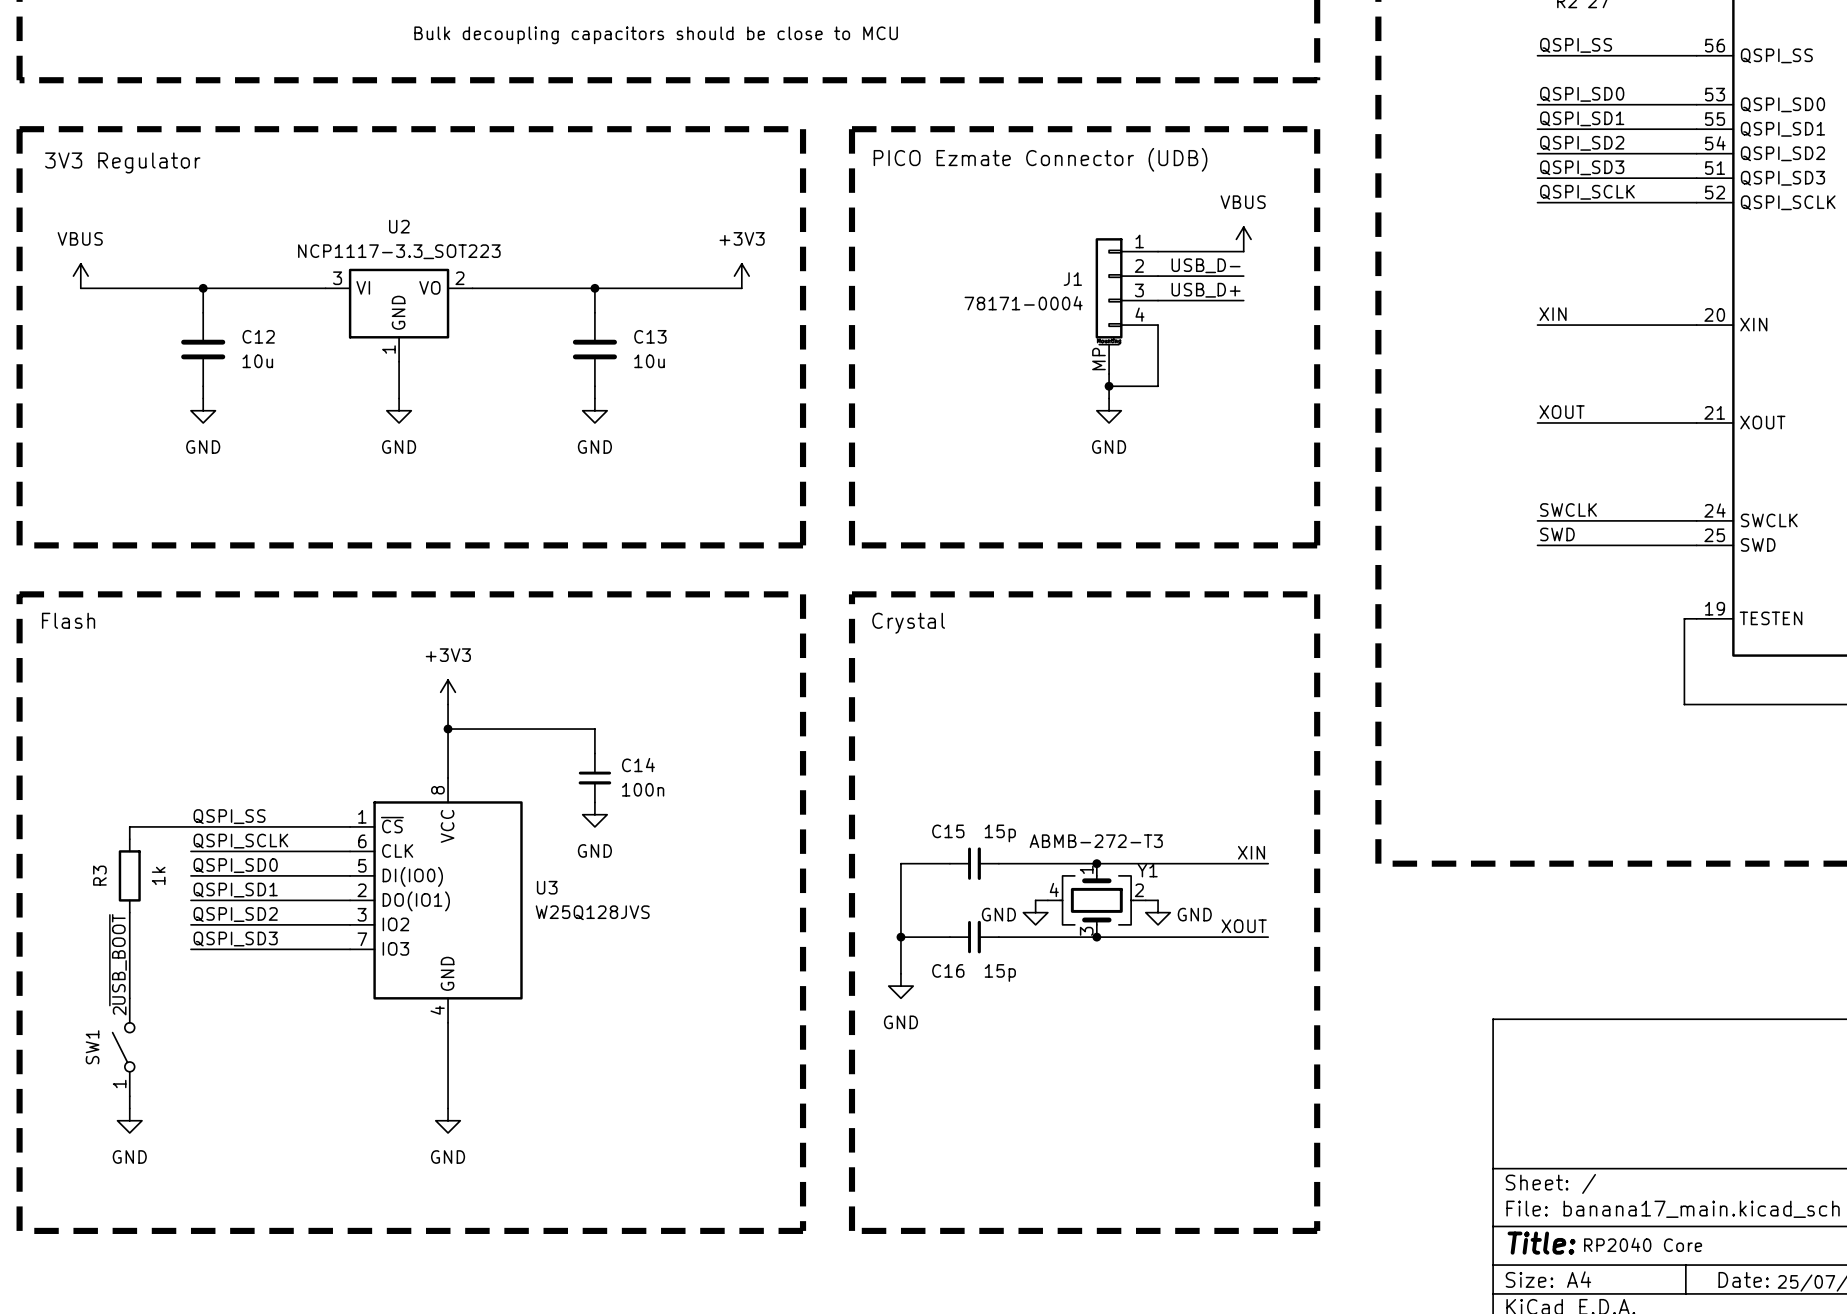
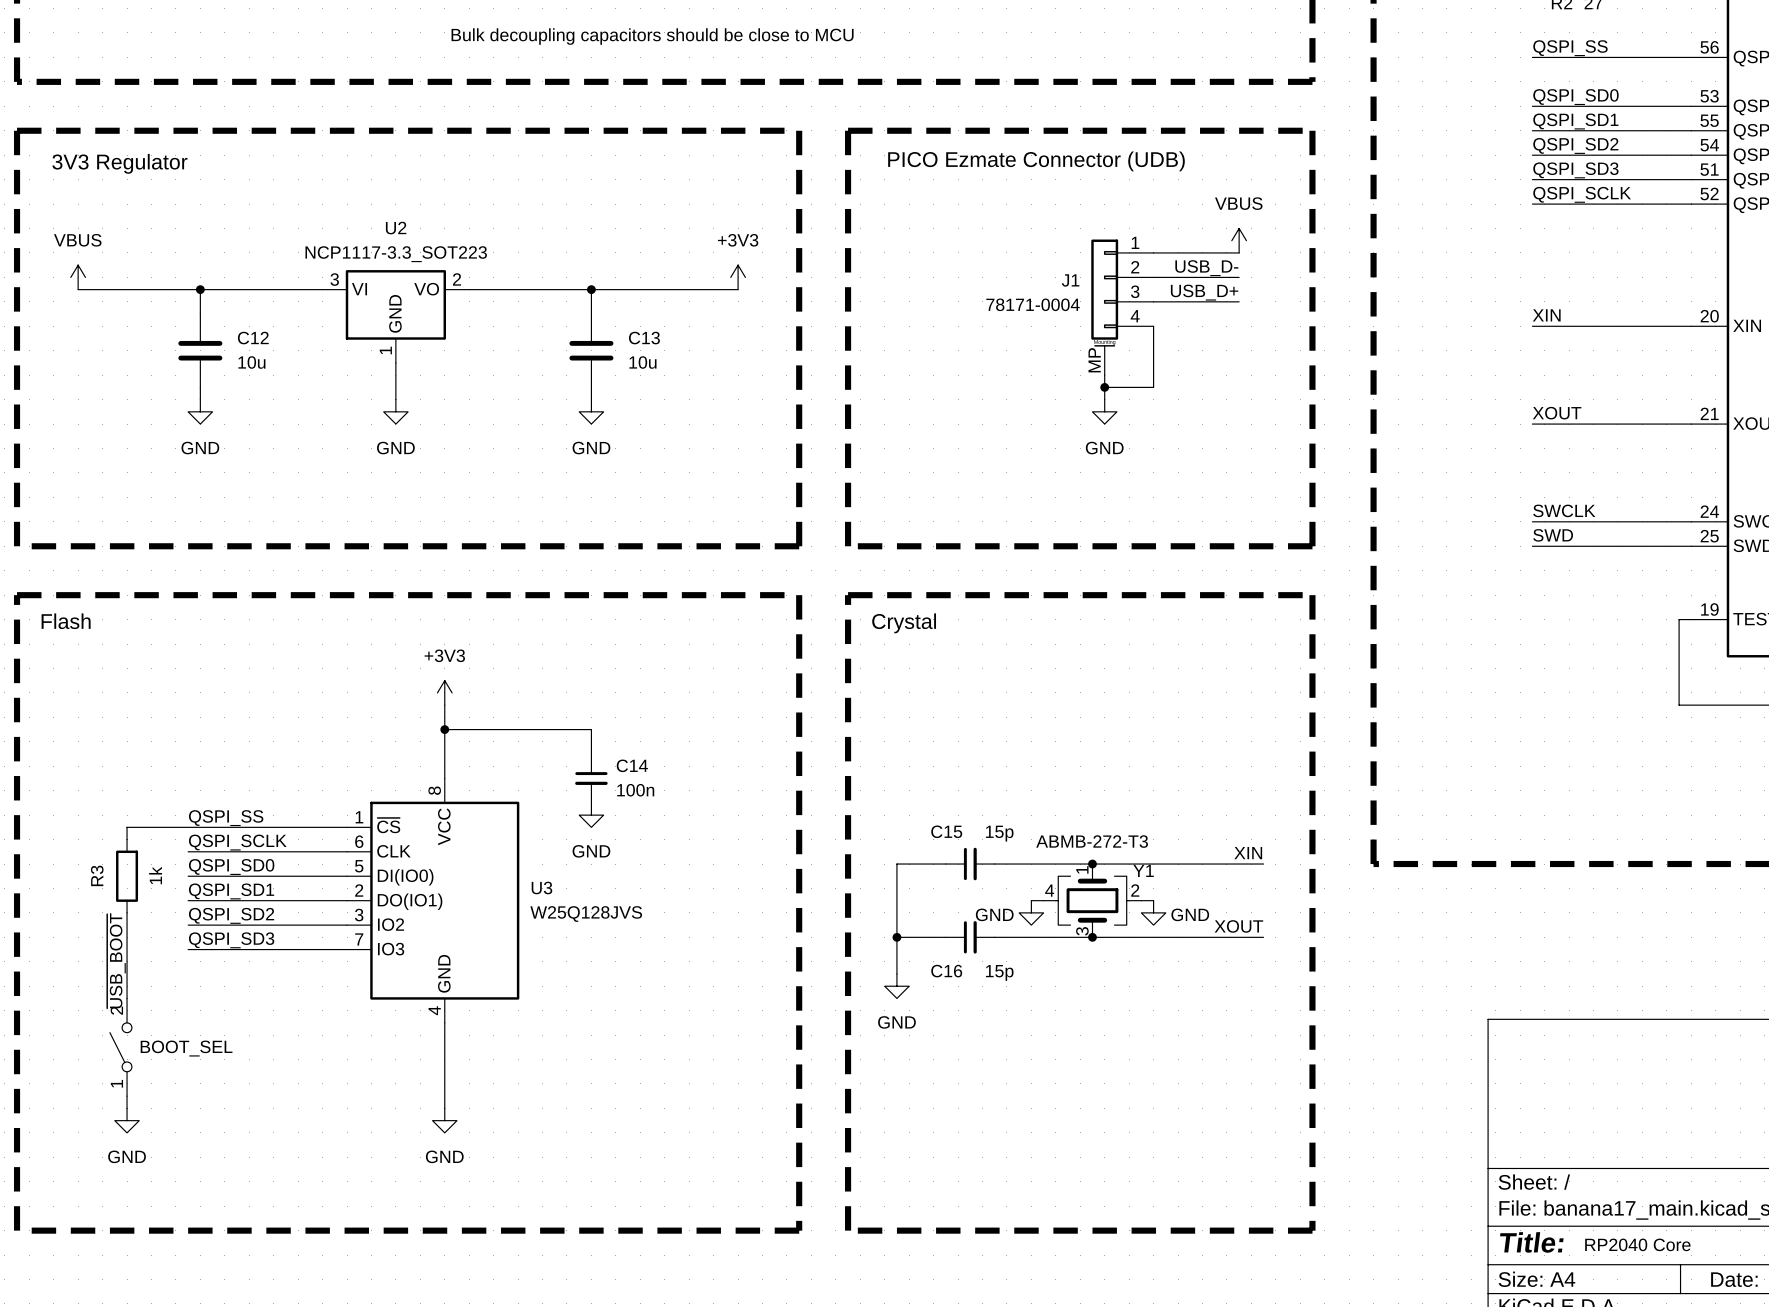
SW1 name: SW1 (92, 1047) -> BOOT_SEL (186, 1048)

